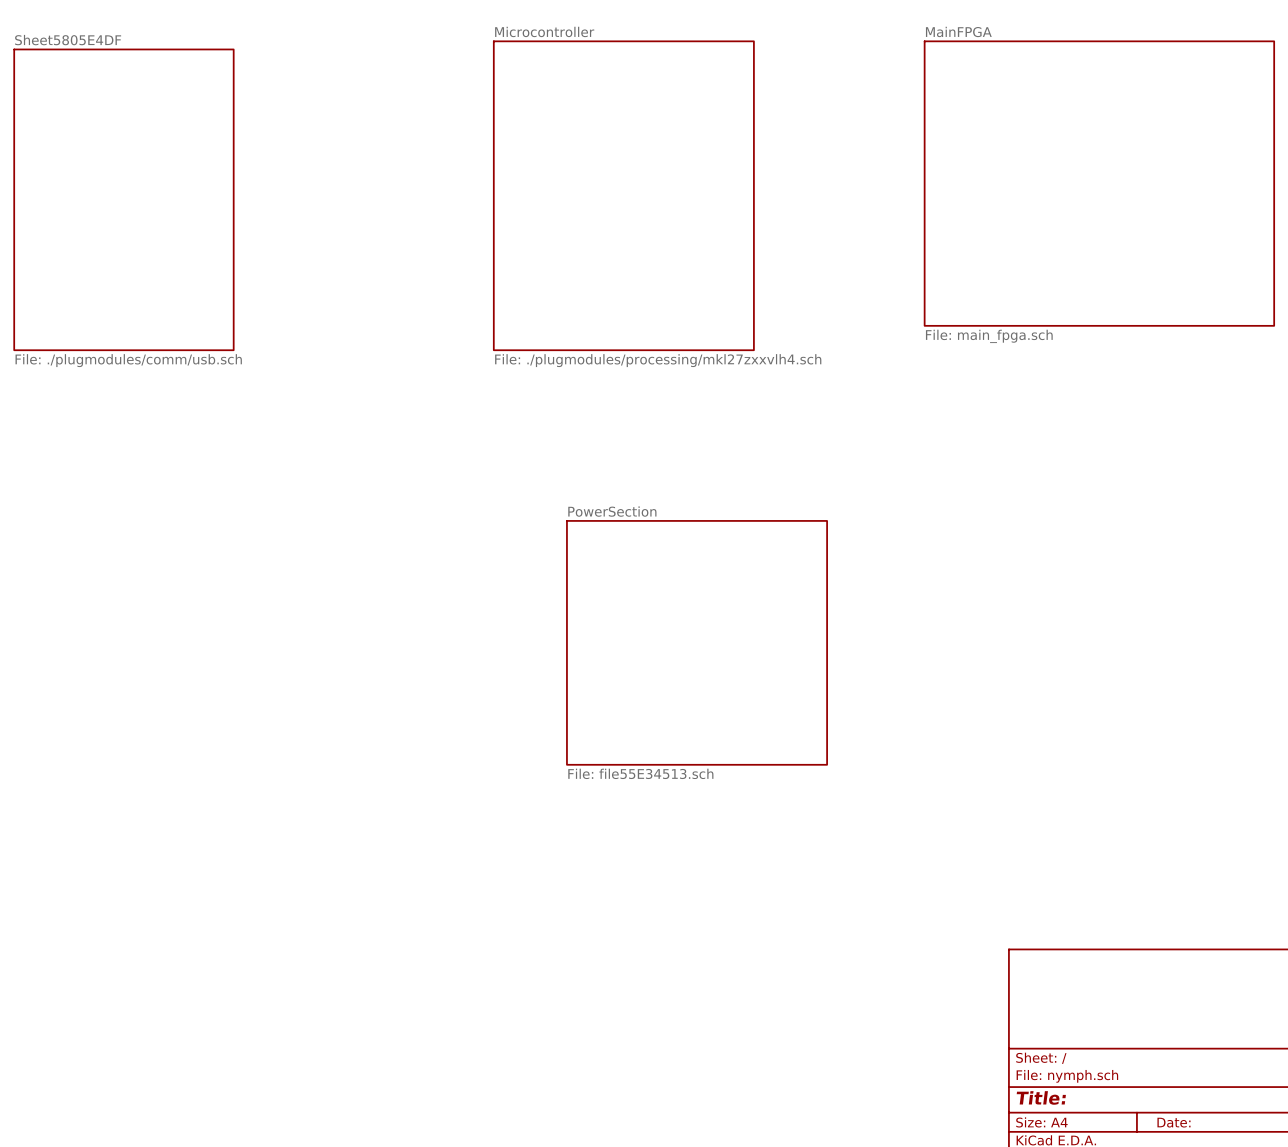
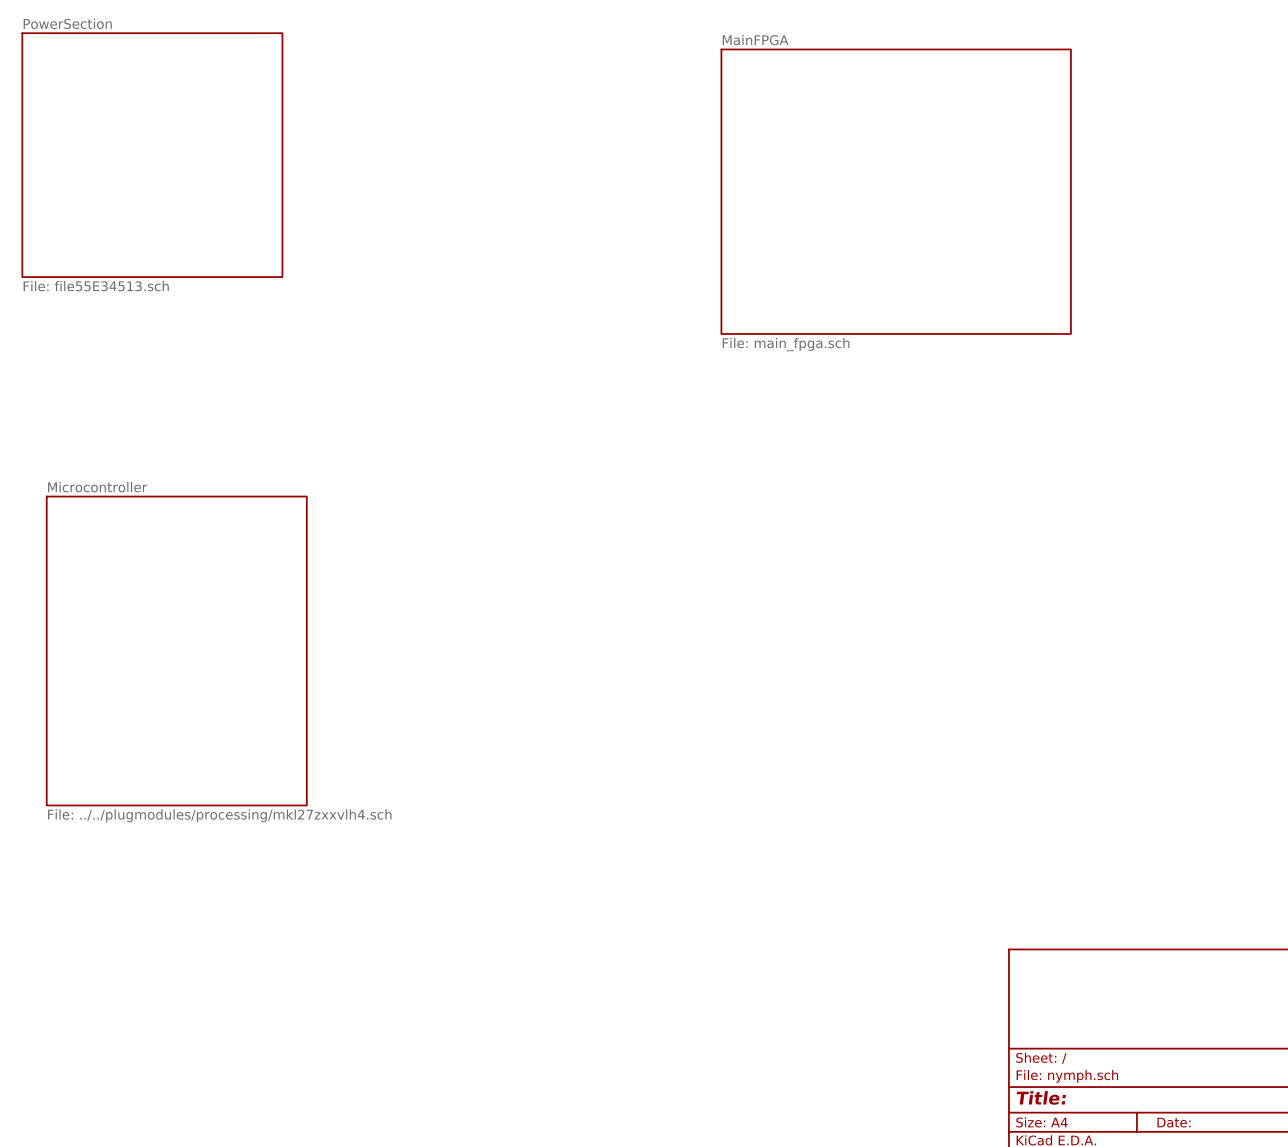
sheet PowerSection: none -> File: file55E34513.sch (152, 155)
sheet MainFPGA: File: main_fpga.sch (1099, 183) -> none
sheet MainFPGA: none -> File: main_fpga.sch (896, 191)
sheet Microcontroller: File: ./plugmodules/processing/mkl27zxxvlh4.sch (623, 195) -> none
sheet Sheet5805E4DF: File: ./plugmodules/comm/usb.sch (123, 199) -> none
sheet PowerSection: File: file55E34513.sch (697, 642) -> none
sheet Microcontroller: none -> File: ../../plugmodules/processing/mkl27zxxvlh4.sch (176, 650)

